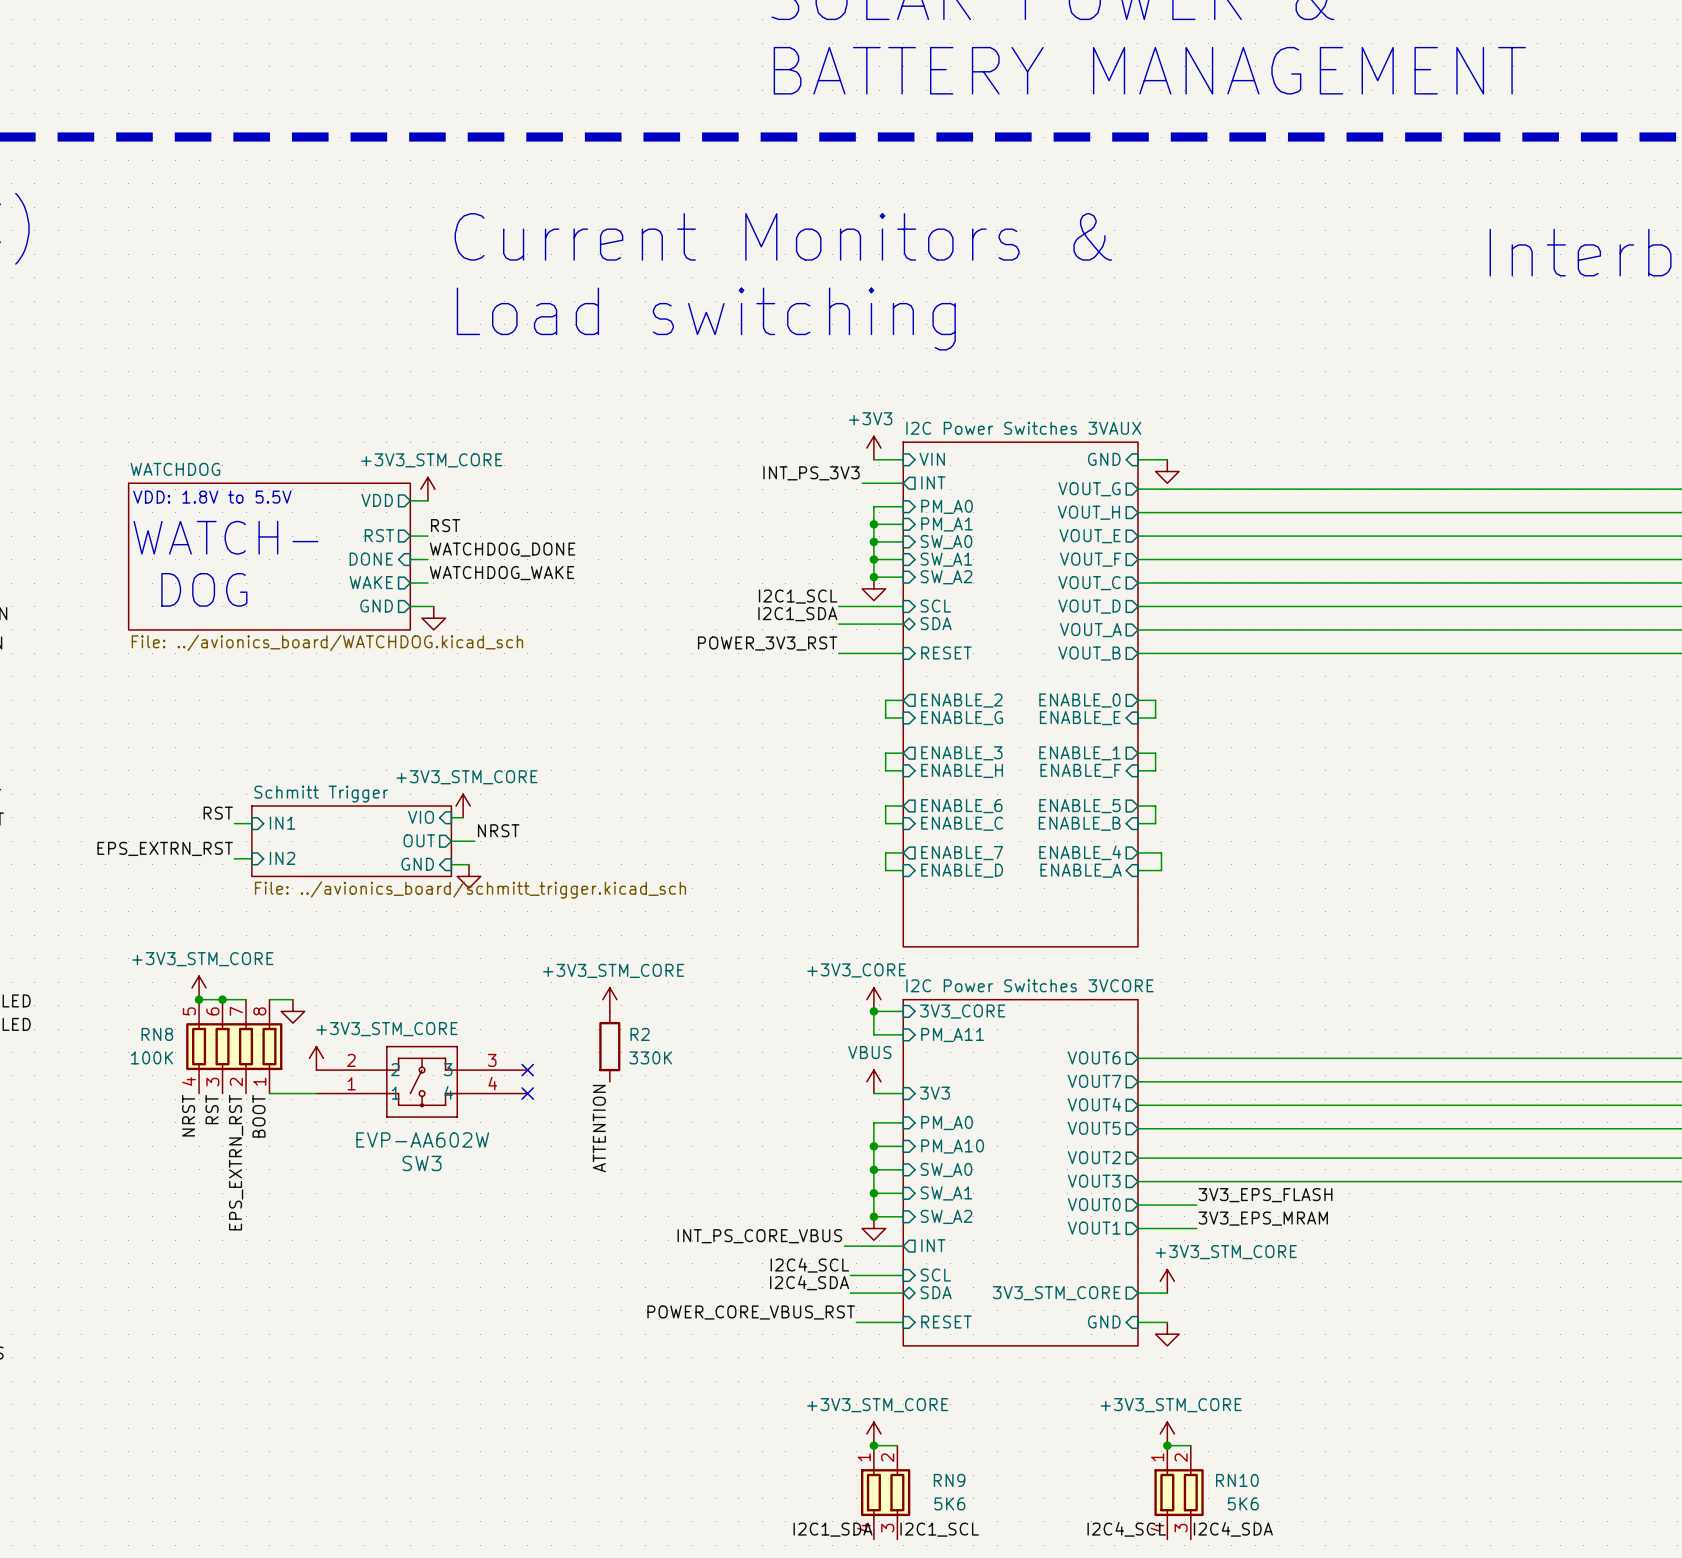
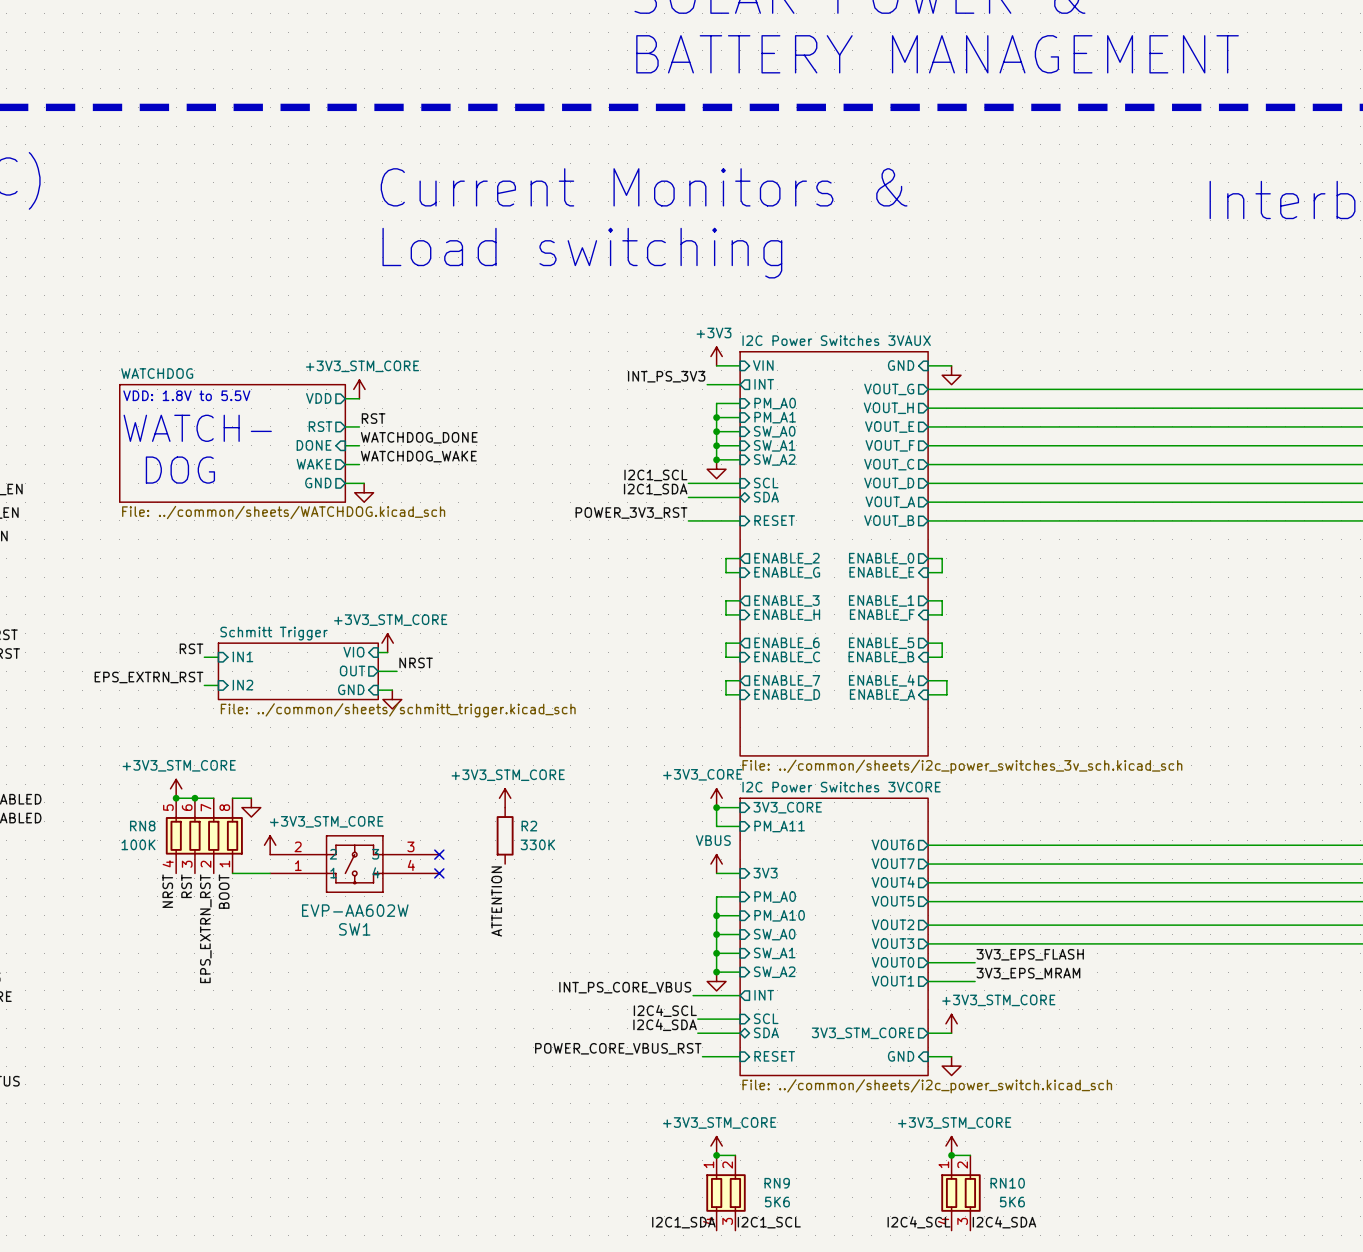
sheet WATCHDOG value: File: ../avionics_board/WATCHDOG.kicad_sch (327, 642) -> File: ../common/sheets/WATCHDOG.kicad_sch (283, 512)
sheet Schmitt Trigger value: File: ../avionics_board/schmitt_trigger.kicad_sch (470, 889) -> File: ../common/sheets/schmitt_trigger.kicad_sch (398, 710)
sheet I2C Power Switches 3VAUX value: none -> File: ../common/sheets/i2c_power_switches_3v_sch.kicad_sch (962, 766)
SW3 name: SW3 (422, 1163) -> SW1 (354, 929)
sheet I2C Power Switches 3VCORE value: none -> File: ../common/sheets/i2c_power_switch.kicad_sch (927, 1086)

